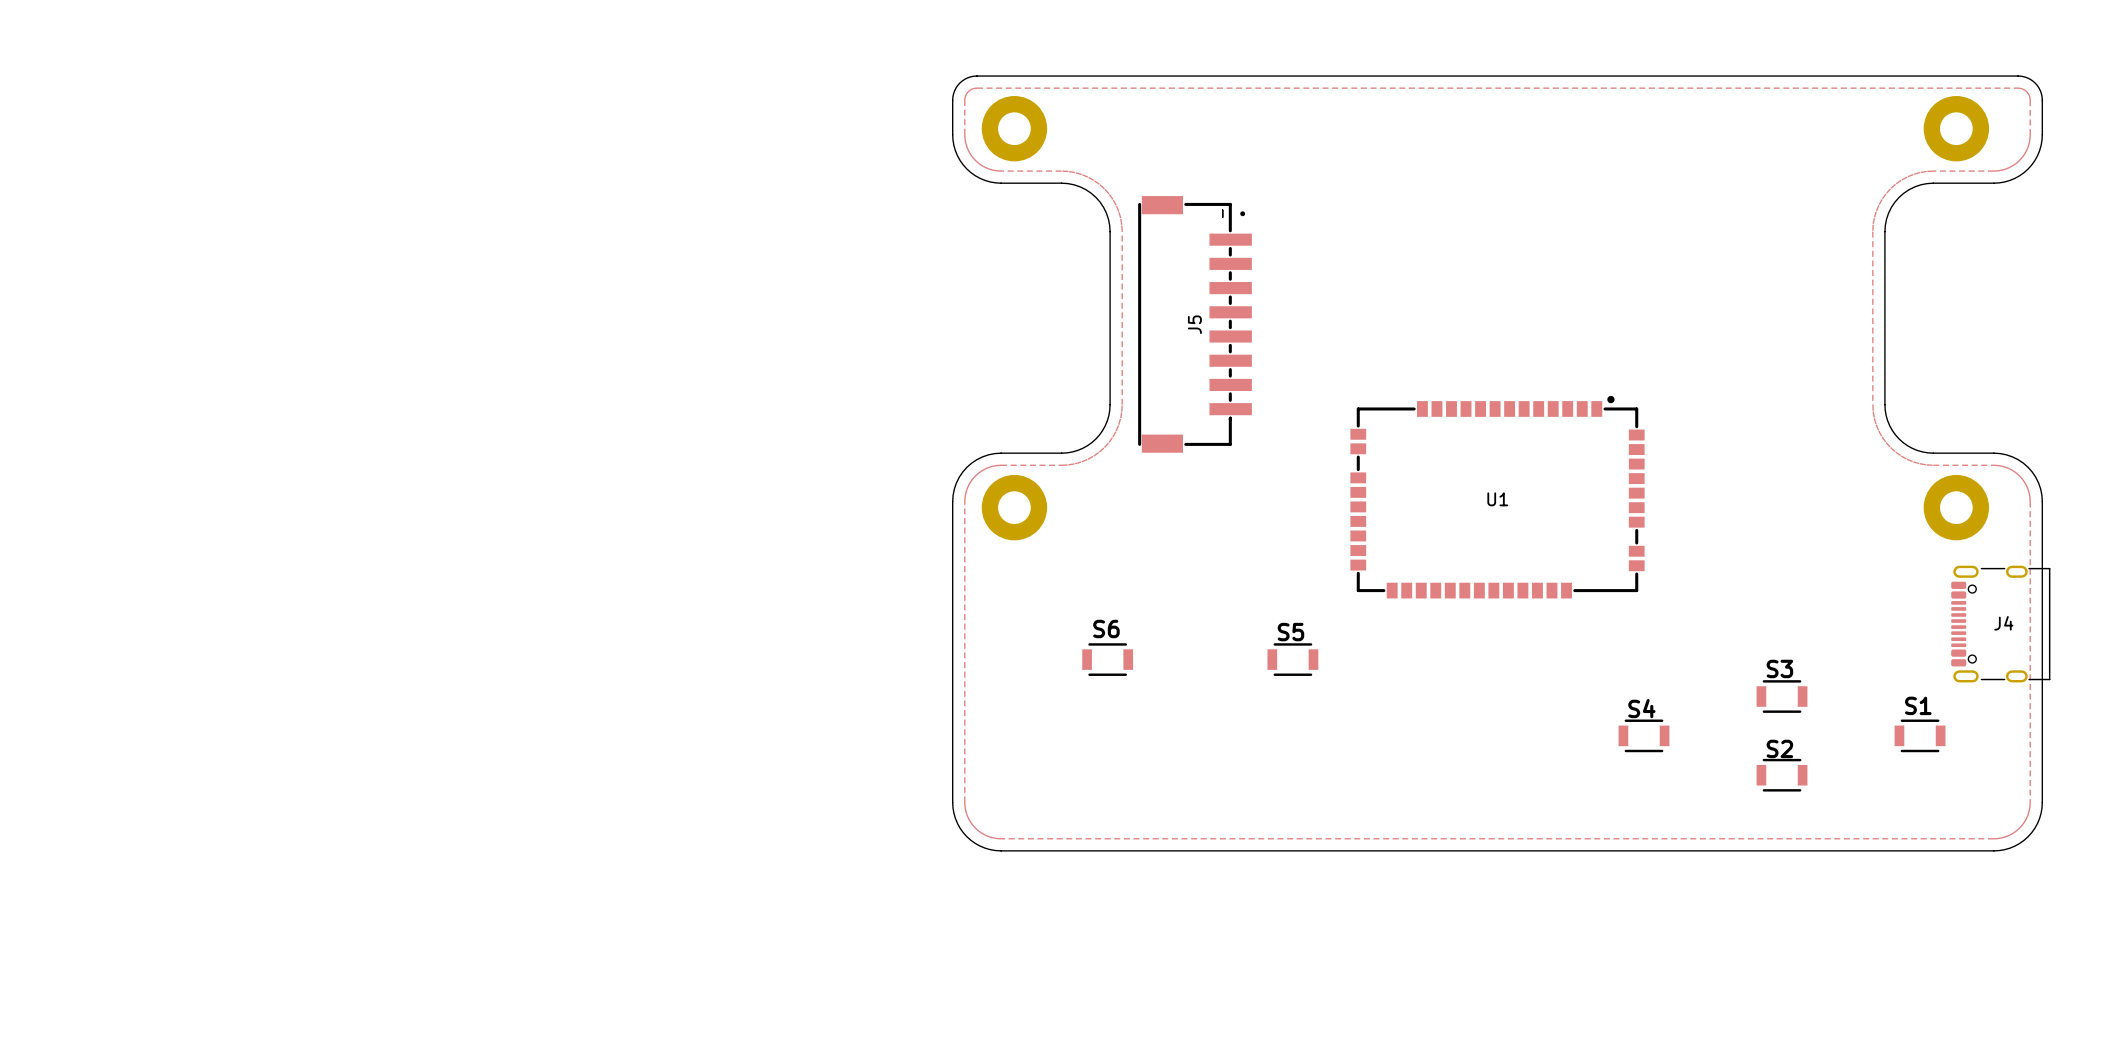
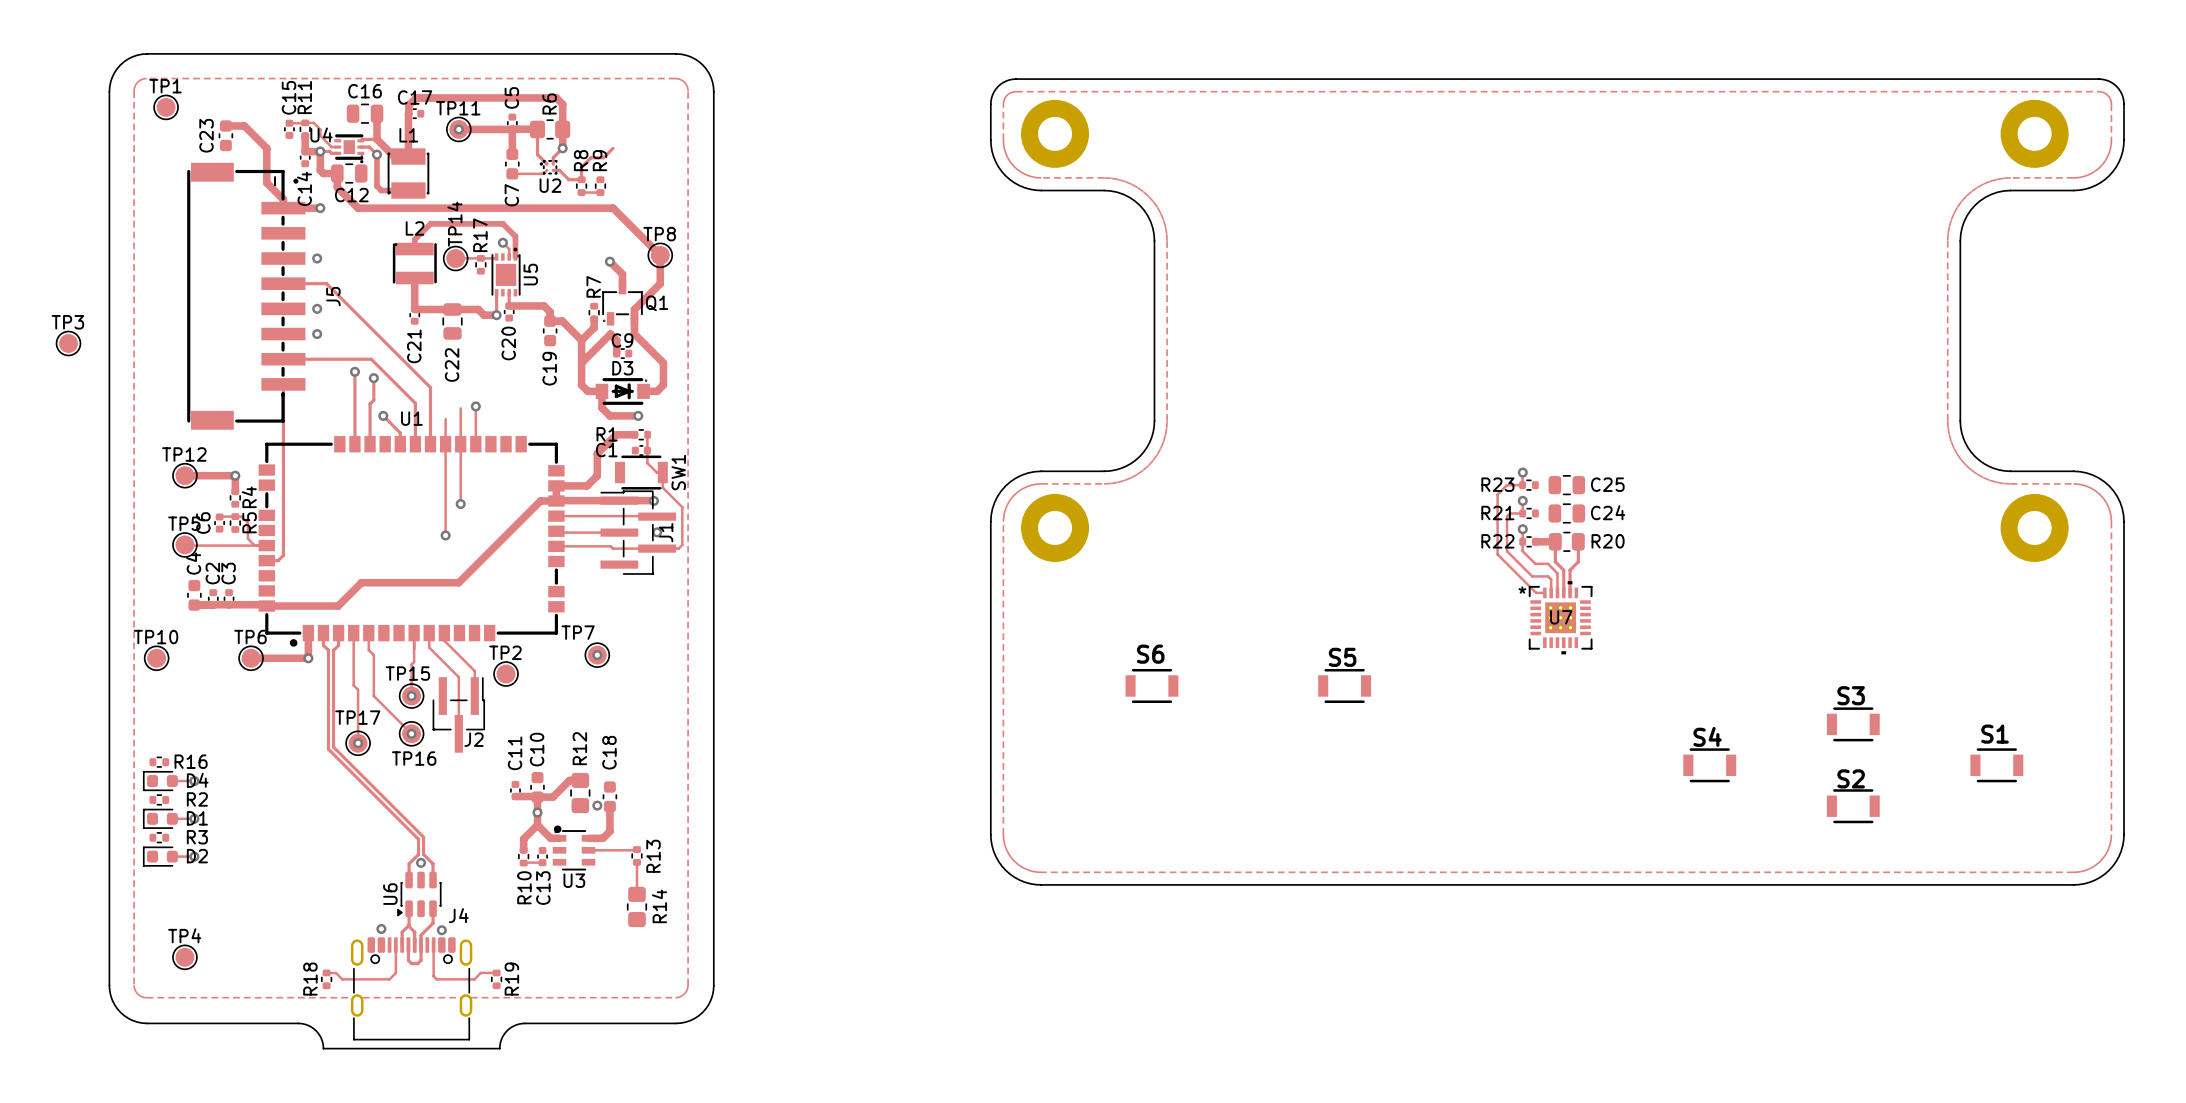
board edge: none -> (147, 53) (676, 53) (694, 58) (708, 72) (713, 91) (713, 985) (708, 1004) (694, 1018) (676, 1023) (522, 1023) (507, 1030) (502, 1037) (499, 1048) (323, 1048) (317, 1032) (303, 1024) (142, 1023) (124, 1015) (114, 1004) (109, 985) (109, 91) (112, 77) (120, 64) (132, 56) (147, 53)
zone outline: none -> (145, 78) (675, 78) (680, 79) (686, 84) (688, 91) (688, 985) (686, 990) (682, 995) (675, 997) (146, 997) (139, 995) (135, 991) (134, 985) (134, 91) (136, 83) (145, 78)
TP1: none -> (166, 107)
C16: none -> (365, 113)
track: none -> (376, 113) (376, 139)
C17: none -> (414, 113)
track: none -> (289, 123) (313, 122) (320, 129) (320, 135) (331, 147) (337, 147)
C5: none -> (512, 123)
track: none -> (225, 125) (244, 125) (266, 148) (266, 182) (283, 199) (283, 208) (320, 208)
C15: none -> (289, 129)
R11: none -> (305, 129)
TP11: none -> (458, 129)
via: none -> (458, 129)
track: none -> (512, 129) (458, 129)
track: none -> (512, 129) (512, 154)
track: none -> (512, 129) (531, 129)
track: none -> (537, 129) (537, 154) (546, 164)
R6: none -> (550, 129)
C23: none -> (225, 135)
track: none -> (305, 135) (305, 151) (320, 151)
track: none -> (376, 139) (360, 140)
track: none -> (376, 139) (394, 156) (408, 156) (408, 105) (416, 97) (556, 97) (562, 104) (562, 148) (553, 157) (553, 164)
track: none -> (360, 147) (369, 147) (376, 154) (376, 186) (381, 190) (408, 190)
via: none -> (562, 148)
track: none -> (613, 148) (603, 157) (591, 157) (581, 167) (581, 179) (568, 179) (559, 170) (553, 170)
U4: none -> (349, 148)
via: none -> (320, 151)
track: none -> (337, 153) (320, 151) (320, 170) (323, 173) (337, 173) (337, 187) (358, 208) (613, 208) (660, 255) (660, 283) (634, 309) (634, 334) (663, 363) (663, 385) (657, 391) (643, 391)
via: none -> (376, 154)
C14: none -> (305, 157)
C7: none -> (512, 164)
U2: none -> (548, 167)
track: none -> (546, 170) (543, 173) (512, 173)
C12: none -> (349, 173)
L1: none -> (408, 173)
R8: none -> (581, 186)
R9: none -> (600, 186)
track: none -> (581, 192) (600, 192)
via: none -> (320, 208)
track: none -> (502, 242) (509, 249) (509, 256)
via: none -> (502, 242)
track: none -> (414, 249) (414, 239) (430, 223) (502, 223) (515, 236) (515, 256)
TP8: none -> (660, 255)
track: none -> (496, 256) (458, 258)
via: none -> (317, 258)
TP14: none -> (455, 258)
track: none -> (609, 261) (622, 274) (622, 287)
via: none -> (609, 261)
L2: none -> (414, 263)
R17: none -> (480, 264)
U5: none -> (506, 272)
track: none -> (414, 278) (415, 309) (478, 309) (484, 315) (496, 315) (496, 292)
track: none -> (283, 283) (326, 283) (430, 387) (430, 444)
track: none -> (509, 292) (509, 305) (544, 305) (550, 312) (550, 321) (562, 321) (581, 340)
Q1: none -> (622, 303)
via: none -> (317, 308)
C20: none -> (509, 312)
R7: none -> (594, 312)
C21: none -> (414, 315)
via: none -> (496, 315)
track: none -> (594, 319) (594, 327) (581, 340)
C22: none -> (452, 321)
C19: none -> (550, 330)
via: none -> (317, 334)
J5 name position: J5 (1194, 324) -> J5 (333, 296)
J5 position: (1195, 324) -> (246, 296)
track: none -> (581, 340) (581, 385) (587, 391) (601, 391) (601, 407) (609, 415) (638, 415)
TP3: none -> (68, 343)
track: none -> (616, 353) (616, 340) (610, 334) (581, 363)
C9: none -> (622, 353)
track: none -> (283, 359) (371, 359) (415, 403) (415, 444)
track: none -> (354, 371) (354, 444)
via: none -> (354, 371)
track: none -> (373, 378) (373, 400) (370, 403) (370, 444)
via: none -> (373, 378)
track: none -> (283, 384) (283, 555) (278, 560) (266, 560)
D3: none -> (622, 391)
track: none -> (475, 406) (475, 444)
via: none -> (475, 406)
track: none -> (460, 408) (460, 504)
track: none -> (383, 415) (400, 432) (400, 444)
via: none -> (383, 415)
via: none -> (638, 415)
track: none -> (445, 419) (445, 535)
track: none -> (634, 434) (616, 434) (597, 453) (597, 475) (587, 485) (556, 485) (556, 501)
R1: none -> (641, 434)
track: none -> (647, 434) (647, 463) (656, 472) (662, 472) (662, 487) (682, 507) (682, 544) (678, 548) (556, 546)
C1: none -> (641, 450)
SW1: none -> (641, 472)
track: none -> (1522, 472) (1522, 485) (1507, 485) (1497, 494) (1497, 554) (1536, 592) (1544, 592)
via: none -> (1522, 472)
track: none -> (184, 475) (235, 475) (235, 491)
TP12: none -> (184, 475)
via: none -> (235, 475)
R23: none -> (1528, 485)
C25: none -> (1566, 485)
R4: none -> (235, 497)
track: none -> (556, 501) (540, 501) (458, 582) (361, 582) (338, 606) (194, 605) (213, 604)
track: none -> (653, 500) (556, 501)
via: none -> (653, 500)
track: none -> (1522, 501) (1522, 513) (1510, 513) (1507, 516) (1507, 551) (1532, 576) (1547, 576) (1551, 579) (1551, 592)
via: none -> (1522, 500)
via: none -> (460, 504)
R21: none -> (1529, 513)
C24: none -> (1566, 513)
track: none -> (219, 516) (241, 516) (247, 522) (247, 538) (254, 545)
track: none -> (556, 516) (657, 516)
U1 rotation: 0° (1497, 497) -> 180° (411, 541)
U1 position: (1497, 497) -> (411, 541)
U1 name position: U1 (1497, 499) -> U1 (411, 418)
C6: none -> (219, 523)
R5: none -> (235, 523)
track: none -> (1522, 529) (1522, 551) (1535, 563) (1548, 563) (1557, 573) (1557, 592)
via: none -> (1522, 529)
track: none -> (556, 531) (619, 532)
via: none -> (657, 532)
J1: none -> (638, 532)
via: none -> (445, 535)
R22: none -> (1529, 541)
track: none -> (1535, 541) (1555, 541) (1555, 561) (1563, 570) (1563, 592)
R20: none -> (1566, 541)
track: none -> (1578, 541) (1578, 561) (1570, 570) (1570, 592)
track: none -> (184, 544) (266, 545)
TP5: none -> (184, 544)
C4: none -> (194, 595)
C2: none -> (213, 598)
C3: none -> (229, 598)
U7: none -> (1560, 617)
track: none -> (308, 633) (308, 658) (251, 658)
track: none -> (323, 633) (323, 645) (328, 650) (328, 749) (418, 839) (418, 854) (409, 863) (409, 880)
track: none -> (338, 633) (338, 645) (333, 650) (333, 747) (423, 837) (423, 854) (433, 863) (433, 880)
track: none -> (368, 633) (368, 650) (373, 655) (373, 696) (411, 733)
track: none -> (414, 633) (411, 696)
track: none -> (429, 633) (429, 647) (458, 677) (458, 733)
track: none -> (444, 633) (444, 640) (474, 671) (474, 696)
track: none -> (354, 634) (353, 633) (353, 685) (358, 689) (358, 743)
J4 name position: J4 (2003, 623) -> J4 (458, 915)
J4 rotation: 0° (2000, 624) -> 90° clockwise (411, 988)
J4 position: (2000, 624) -> (411, 988)
TP7: none -> (597, 655)
via: none -> (597, 655)
TP10: none -> (156, 658)
TP6: none -> (251, 658)
via: none -> (308, 658)
TP2: none -> (506, 674)
TP15: none -> (411, 696)
via: none -> (411, 696)
J2: none -> (458, 714)
TP16: none -> (411, 733)
via: none -> (411, 733)
TP17: none -> (358, 743)
via: none -> (358, 743)
R16: none -> (159, 762)
track: none -> (580, 780) (569, 780) (552, 797) (537, 797) (537, 825)
D4: none -> (160, 781)
track: none -> (172, 781) (194, 781)
via: none -> (194, 781)
C10: none -> (537, 787)
C11: none -> (515, 790)
R12: none -> (580, 793)
track: none -> (515, 796) (536, 796)
C18: none -> (609, 796)
R2: none -> (159, 799)
via: none -> (597, 805)
track: none -> (609, 806) (609, 831) (602, 838) (588, 838)
via: none -> (537, 812)
D1: none -> (160, 818)
track: none -> (172, 818) (194, 818)
via: none -> (194, 818)
track: none -> (537, 825) (523, 838) (523, 850)
track: none -> (537, 825) (550, 838) (559, 838)
R3: none -> (159, 837)
U3: none -> (574, 847)
track: none -> (588, 850) (636, 850)
D2: none -> (160, 856)
track: none -> (172, 856) (194, 856)
via: none -> (194, 856)
R10: none -> (523, 856)
C13: none -> (542, 856)
R13: none -> (636, 855)
via: none -> (421, 862)
track: none -> (524, 862) (542, 862)
track: none -> (636, 862) (636, 894)
U6: none -> (419, 894)
R14: none -> (636, 906)
track: none -> (409, 908) (409, 925) (402, 932) (402, 945)
track: none -> (433, 908) (433, 923) (421, 935) (421, 960) (417, 963) (411, 963) (408, 960) (408, 945)
track: none -> (408, 925) (414, 932) (414, 945)
via: none -> (381, 928)
via: none -> (441, 930)
track: none -> (395, 945) (395, 973) (389, 979) (342, 979) (336, 973) (329, 973)
track: none -> (433, 945) (433, 976) (436, 979) (474, 979) (480, 972) (496, 972)
TP4: none -> (184, 957)
R18: none -> (326, 979)
R19: none -> (496, 979)

